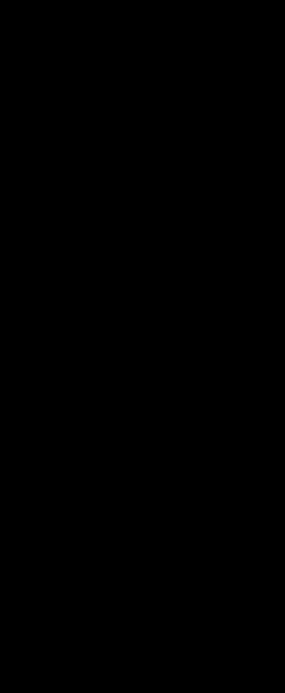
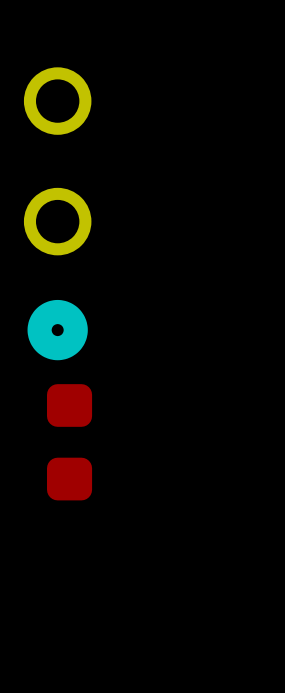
part: none -> (57, 213)
part: none -> (69, 442)

